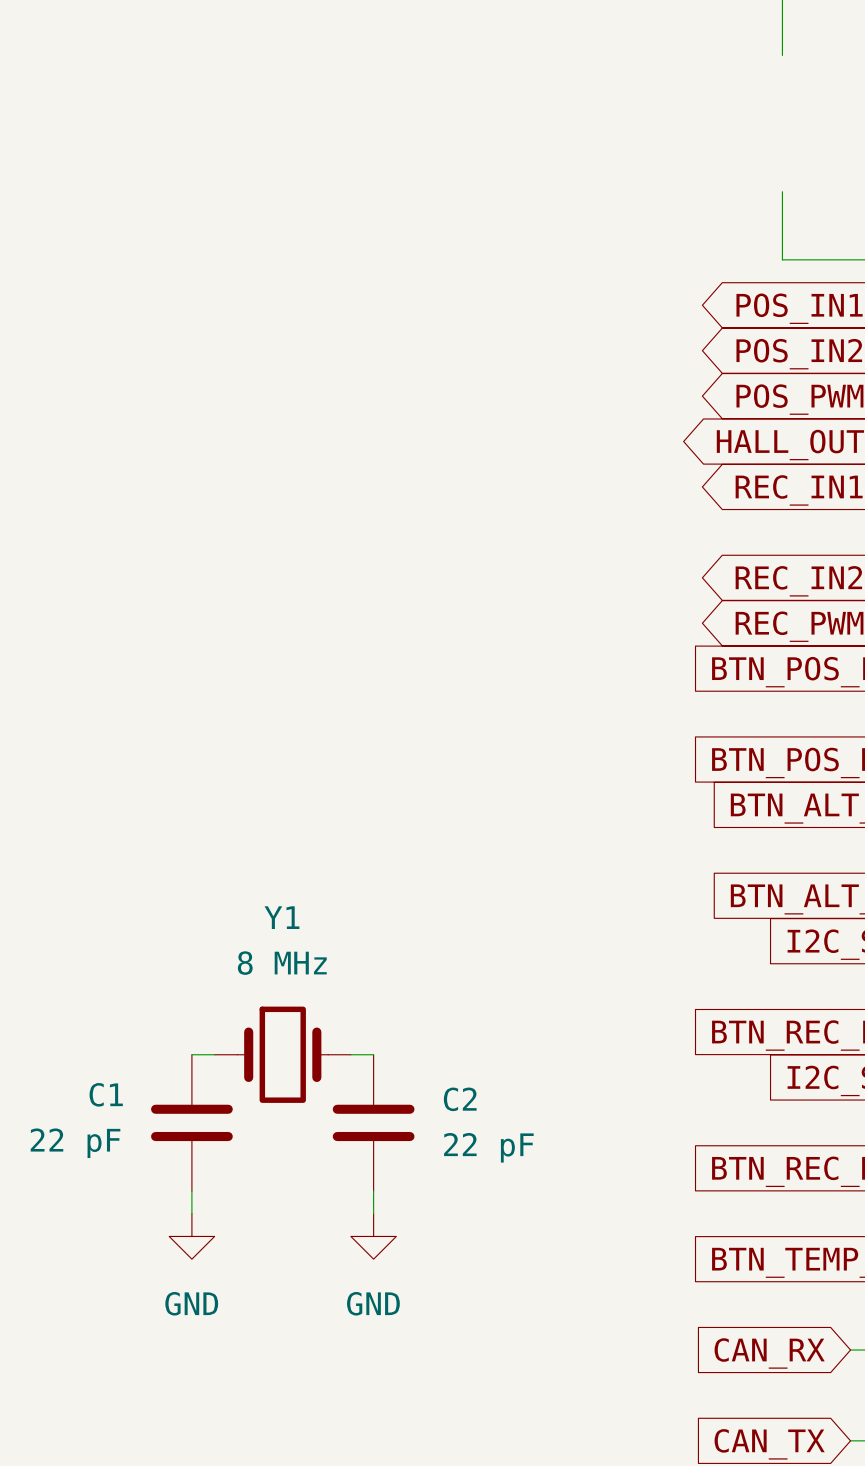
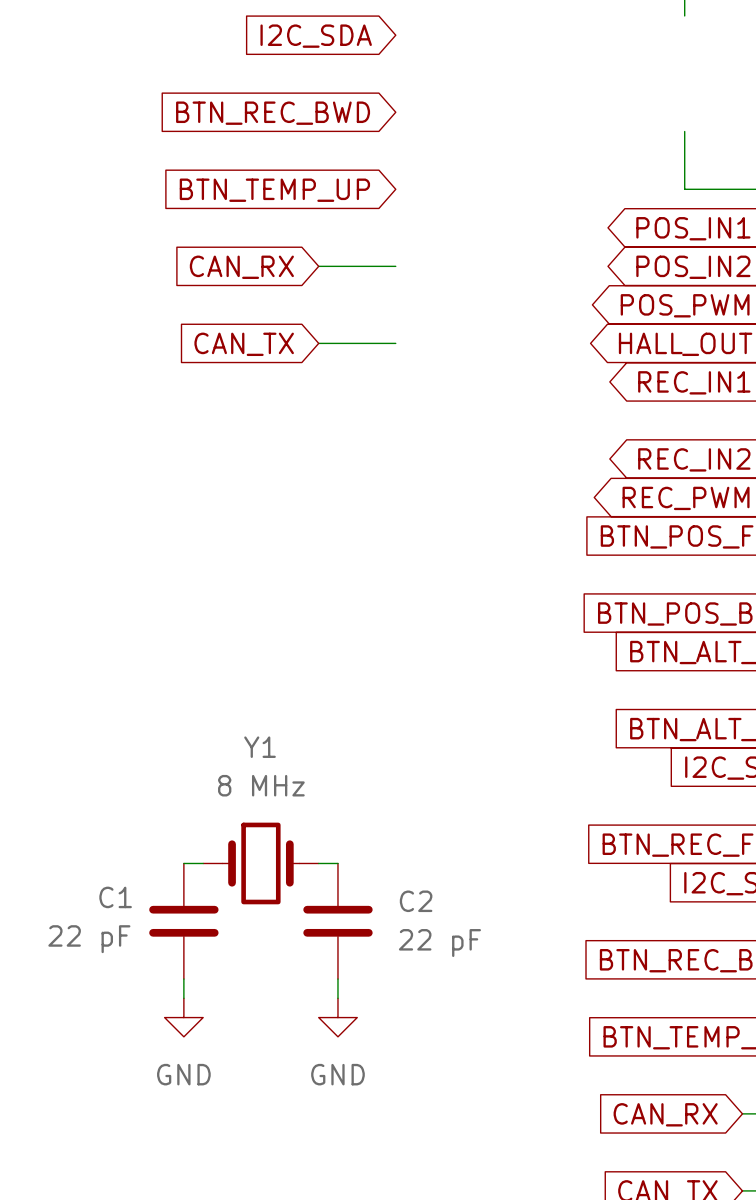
global label: none -> I2C_SDA (316, 36)
global label: none -> BTN_REC_BWD (273, 113)
global label: none -> BTN_TEMP_UP (274, 190)
wire: none -> (318, 266) (395, 266)
global label: none -> CAN_RX (241, 267)
wire: none -> (318, 343) (395, 343)
global label: none -> CAN_TX (244, 344)

